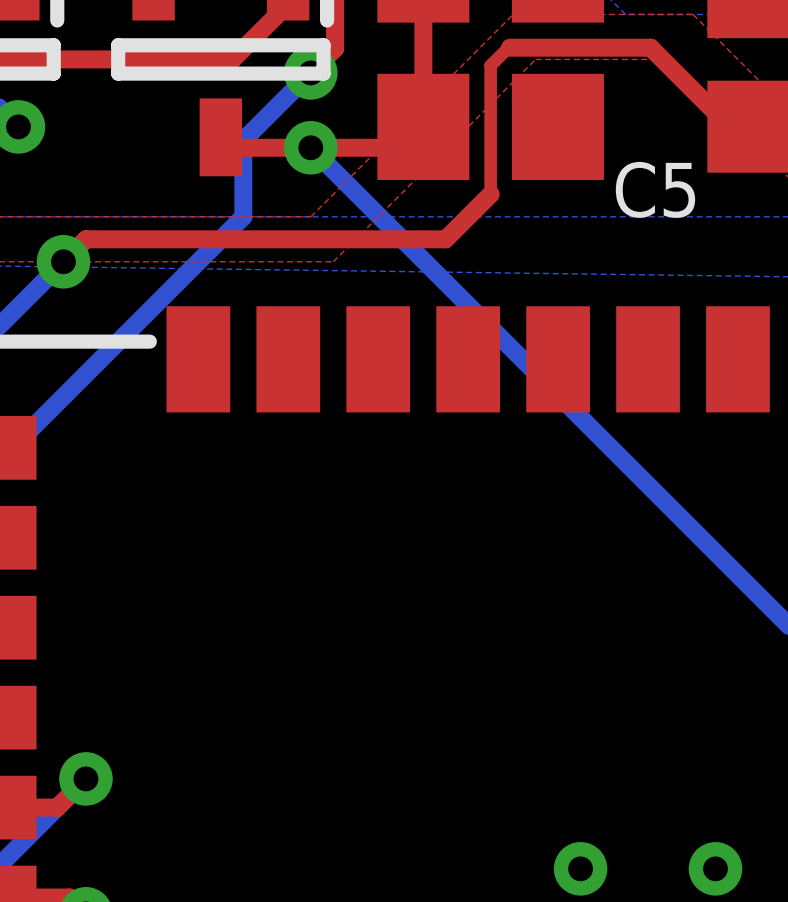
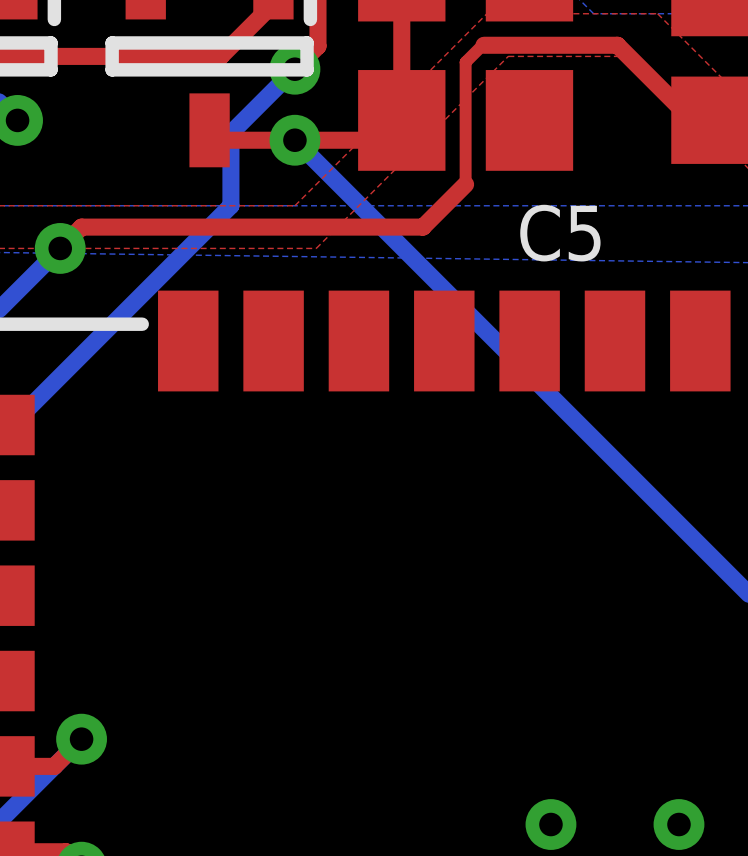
C5 name position: C5 (655, 189) -> C5 (560, 233)

